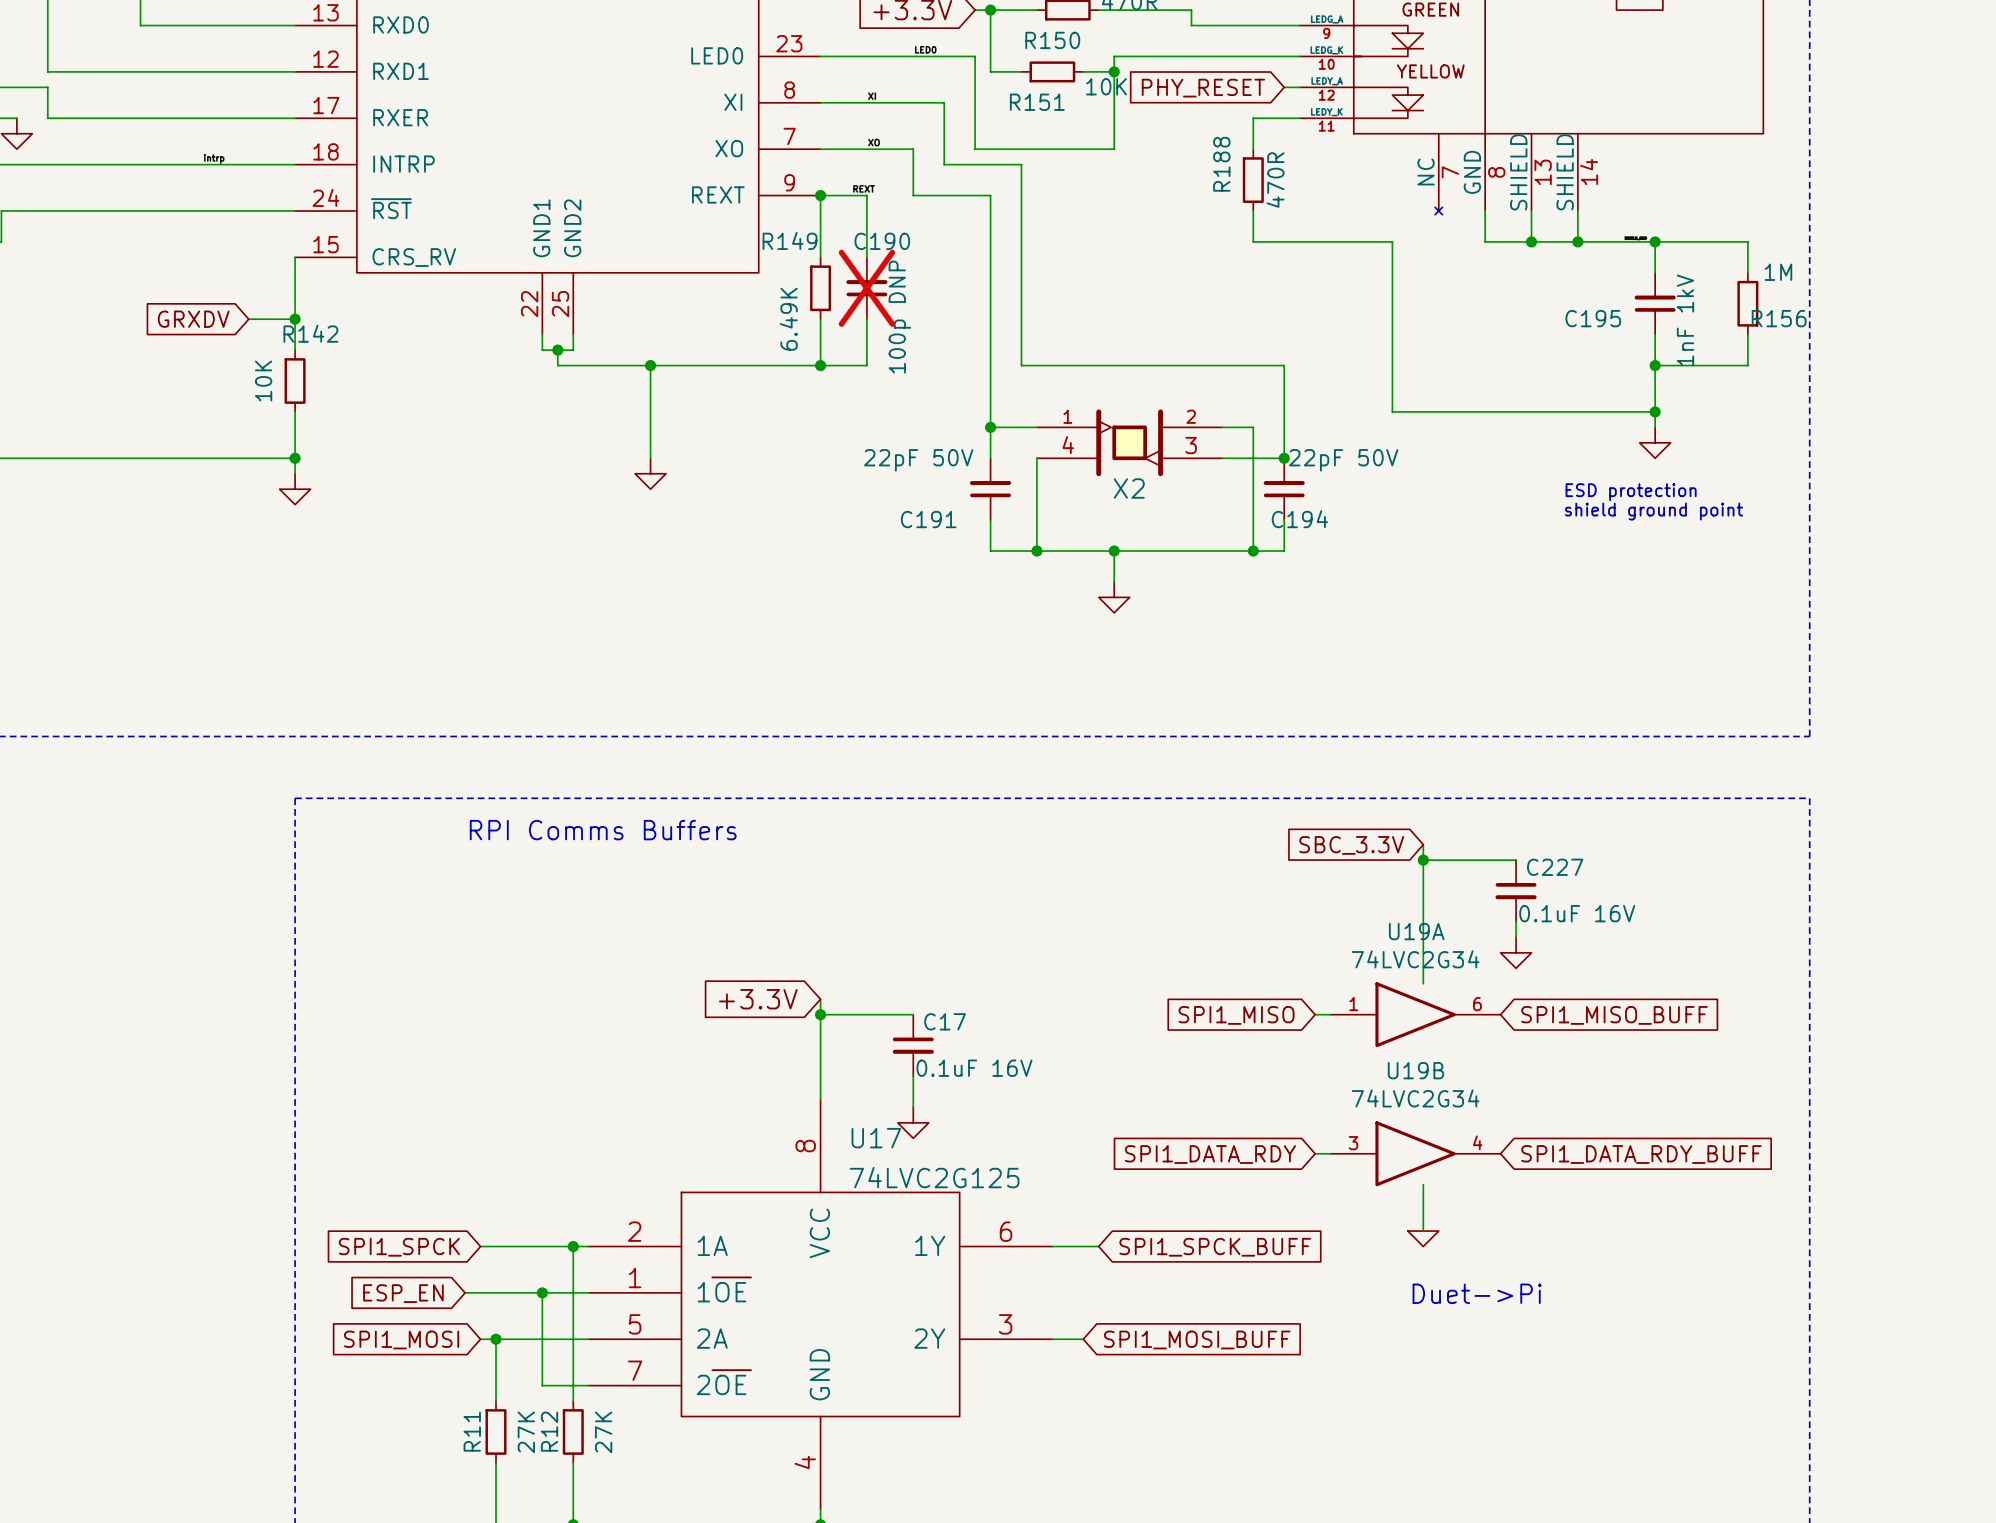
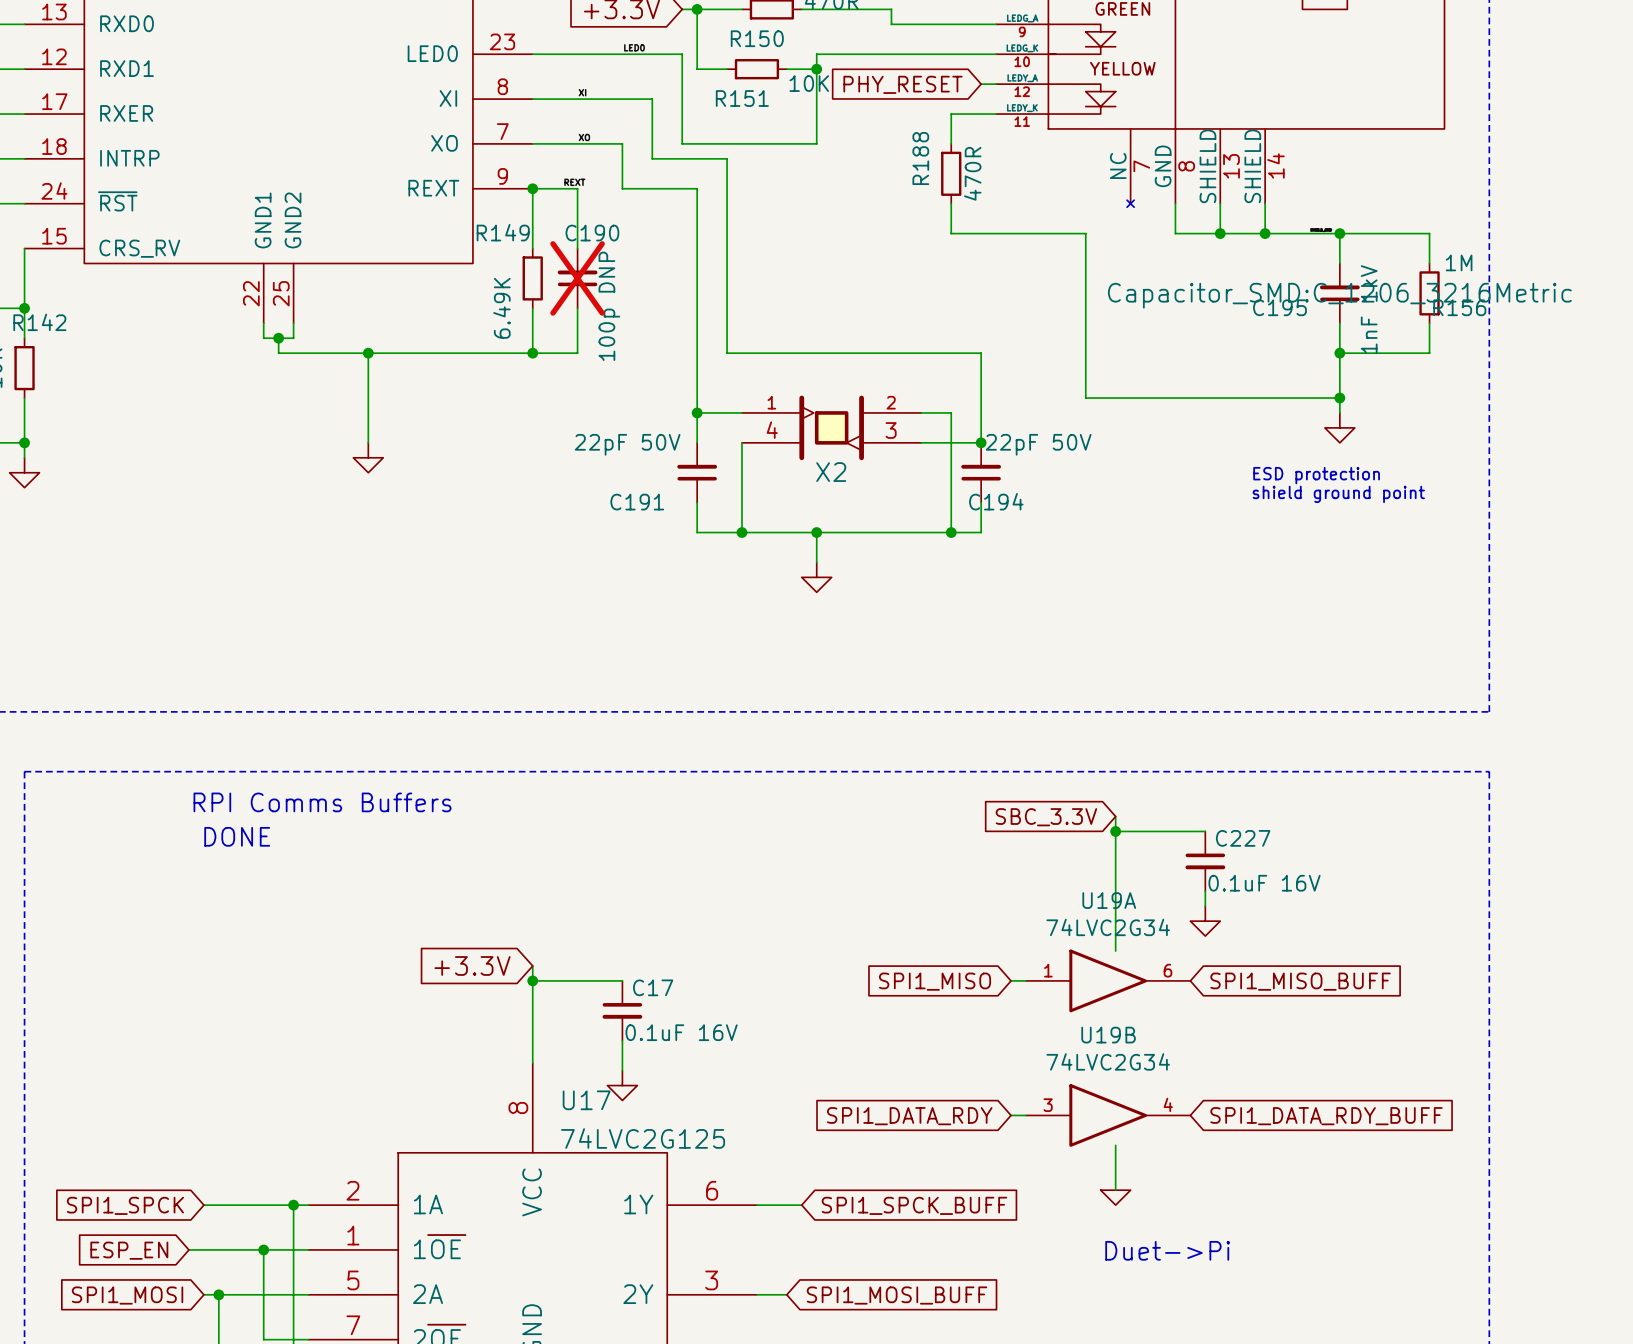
C195 text: none -> Capacitor_SMD:C_1206_3216Metric (1339, 295)
text: none -> DONE (237, 836)

